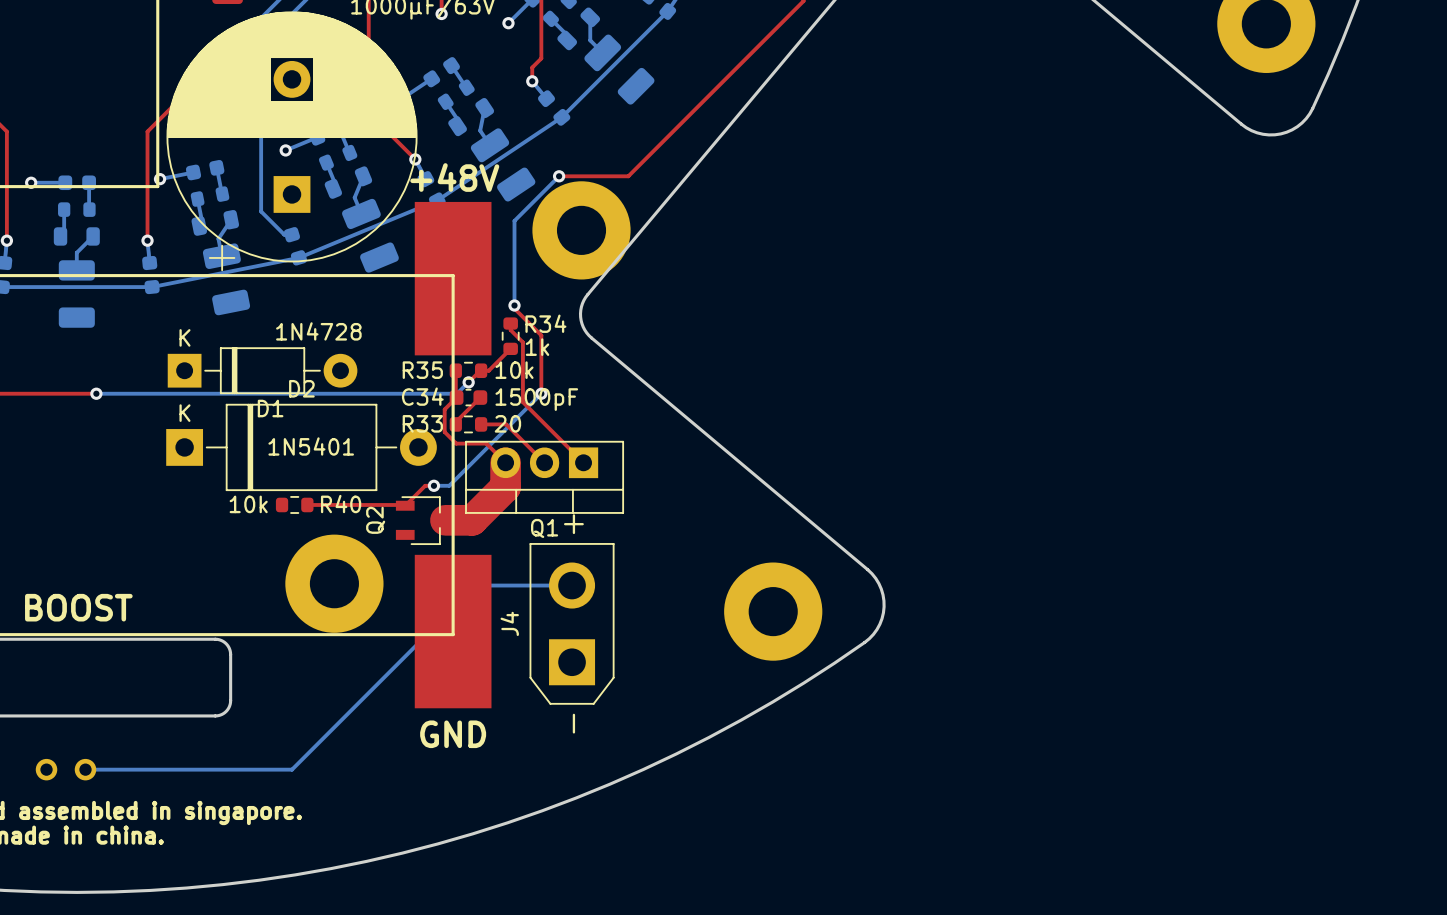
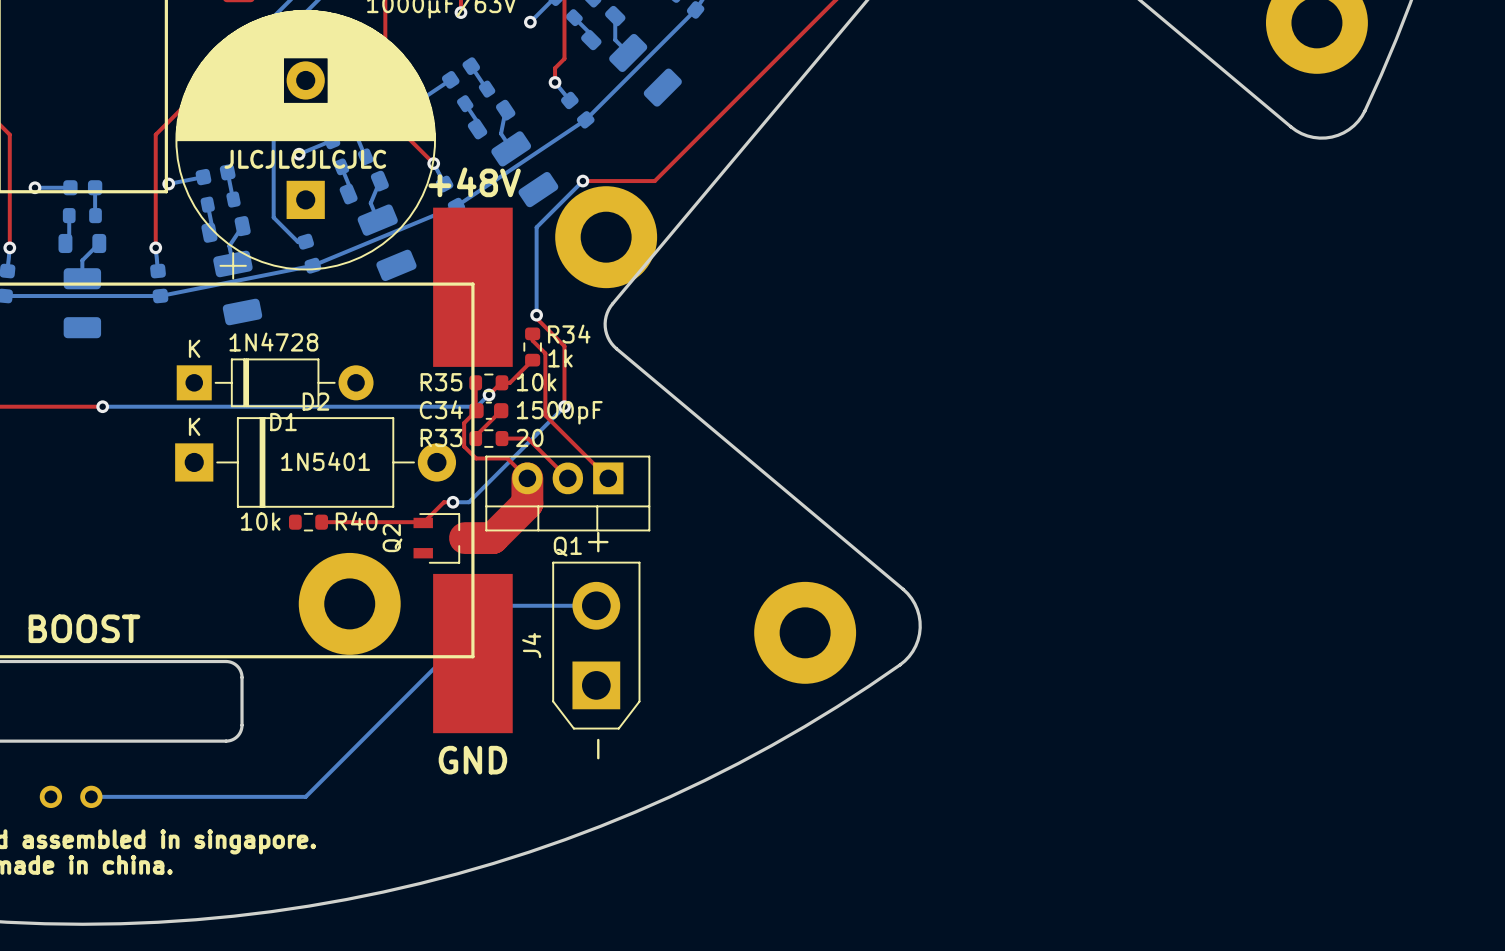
text: none -> JLCJLCJLCJLC (305, 159)
D1 value position: 1N4728 (318, 331) -> 1N4728 (273, 342)

